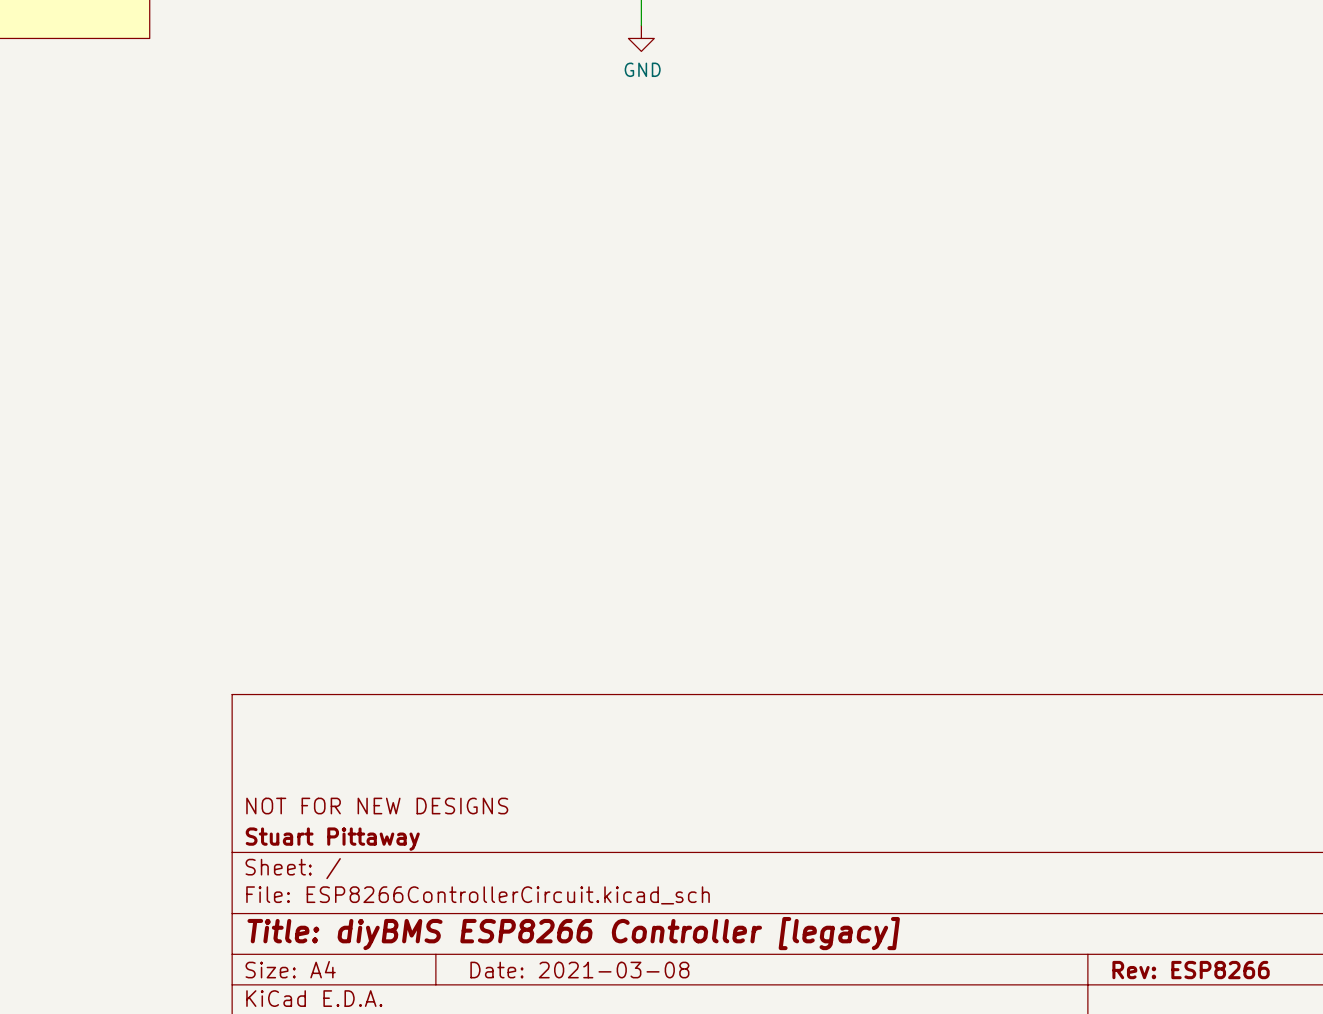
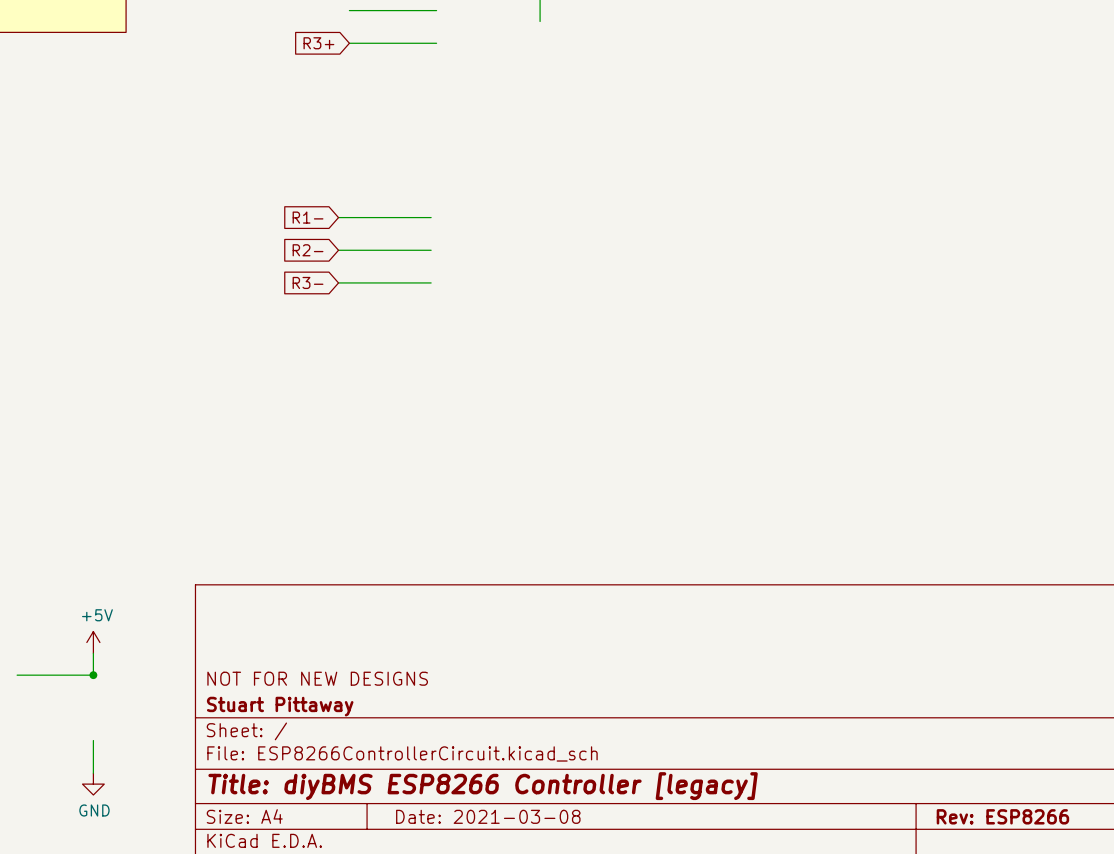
wire: none -> (349, 10) (436, 10)
power symbol: GND (641, 38) -> none
global label: none -> R3+ (318, 43)
wire: none -> (349, 43) (436, 43)
global label: none -> R1- (308, 217)
wire: none -> (338, 217) (431, 217)
global label: none -> R2- (308, 250)
wire: none -> (338, 250) (431, 250)
global label: none -> R3- (308, 282)
wire: none -> (338, 282) (431, 282)
power symbol: none -> +5V (93, 642)
wire: none -> (93, 653) (93, 675) (17, 675)
junction: none -> (93, 675)
wire: none -> (93, 740) (93, 773)
power symbol: none -> GND (93, 784)

